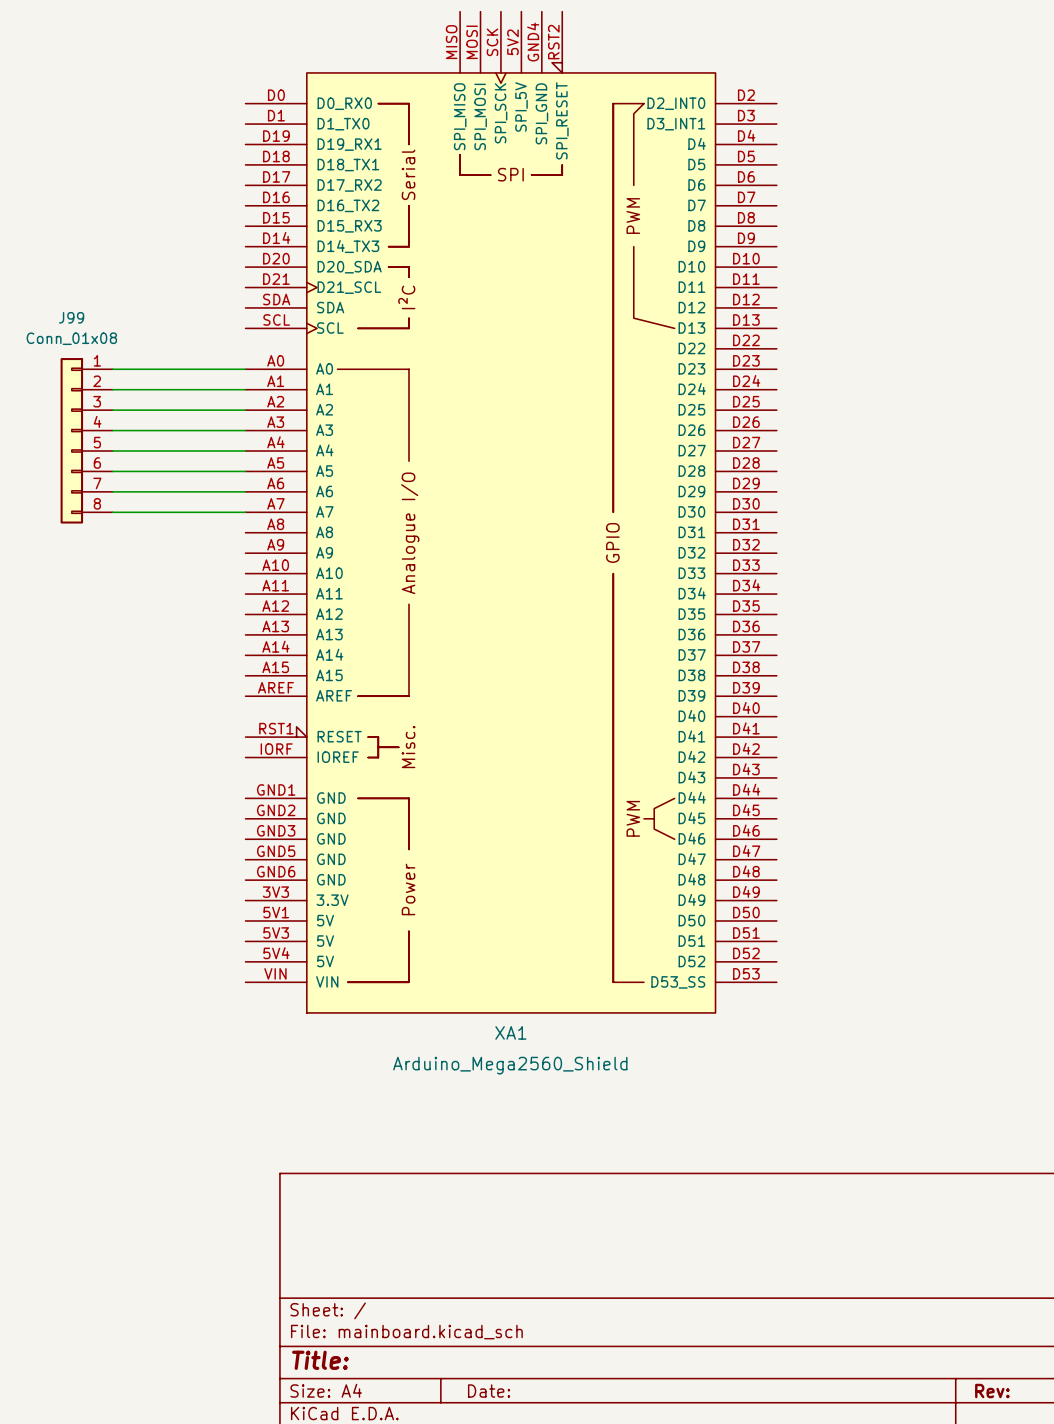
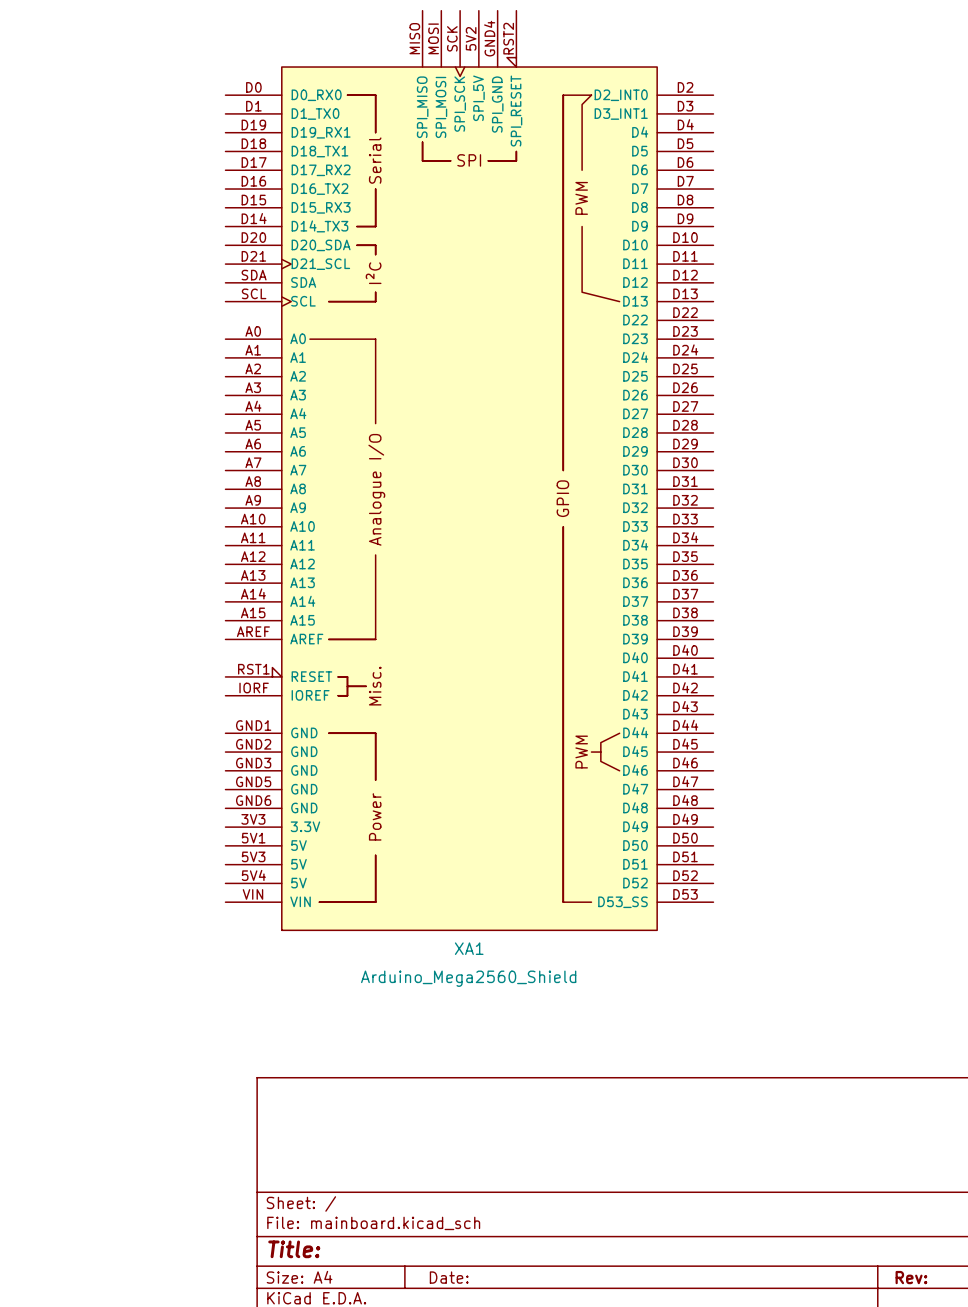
wire: (112, 369) (245, 369) -> none
wire: (112, 389) (245, 389) -> none
wire: (112, 410) (245, 410) -> none
wire: (112, 430) (245, 430) -> none
J99: Conn_01x08 (86, 440) -> none
wire: (112, 451) (245, 451) -> none
wire: (112, 471) (245, 471) -> none
wire: (112, 491) (245, 491) -> none
wire: (112, 512) (245, 512) -> none

